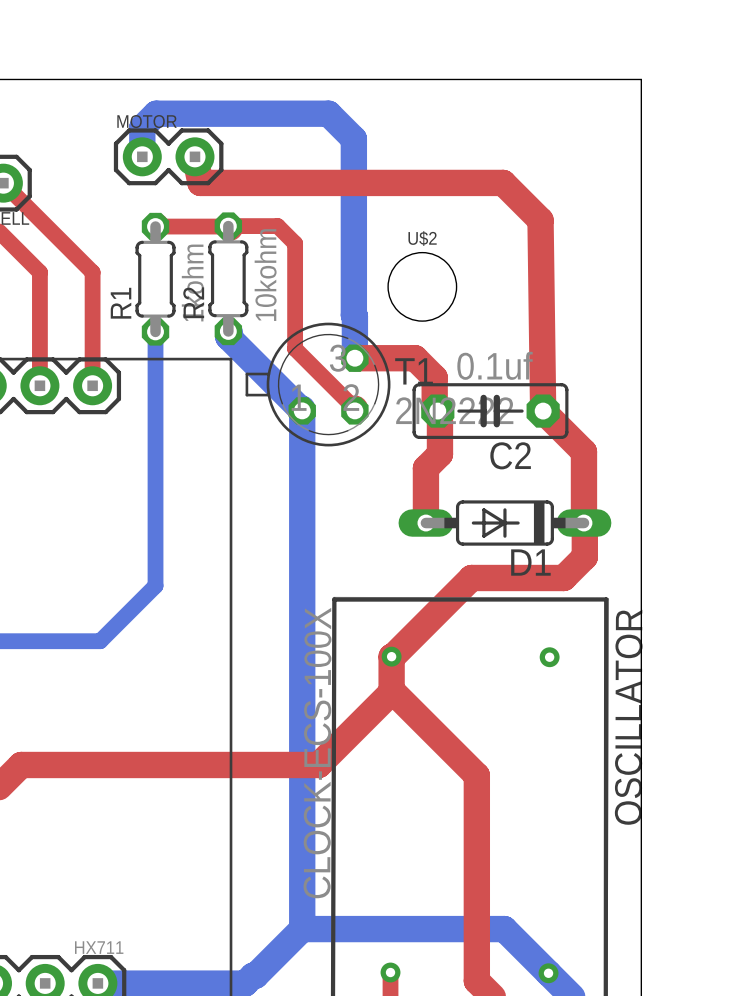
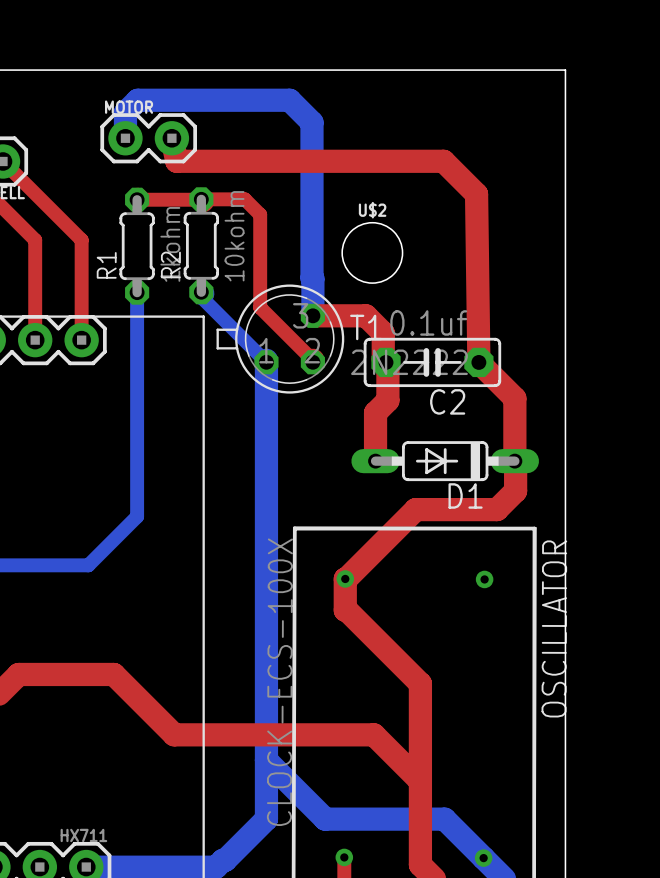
bottom track width: thick (228, 331) (228, 337) (302, 410) -> thin (201, 292) (201, 297) (266, 362)
top track: (391, 692) (318, 764) (129, 764) -> (420, 781) (373, 734) (174, 734) (113, 674)
bottom track: (302, 929) (368, 929) -> (266, 760) (325, 819)

